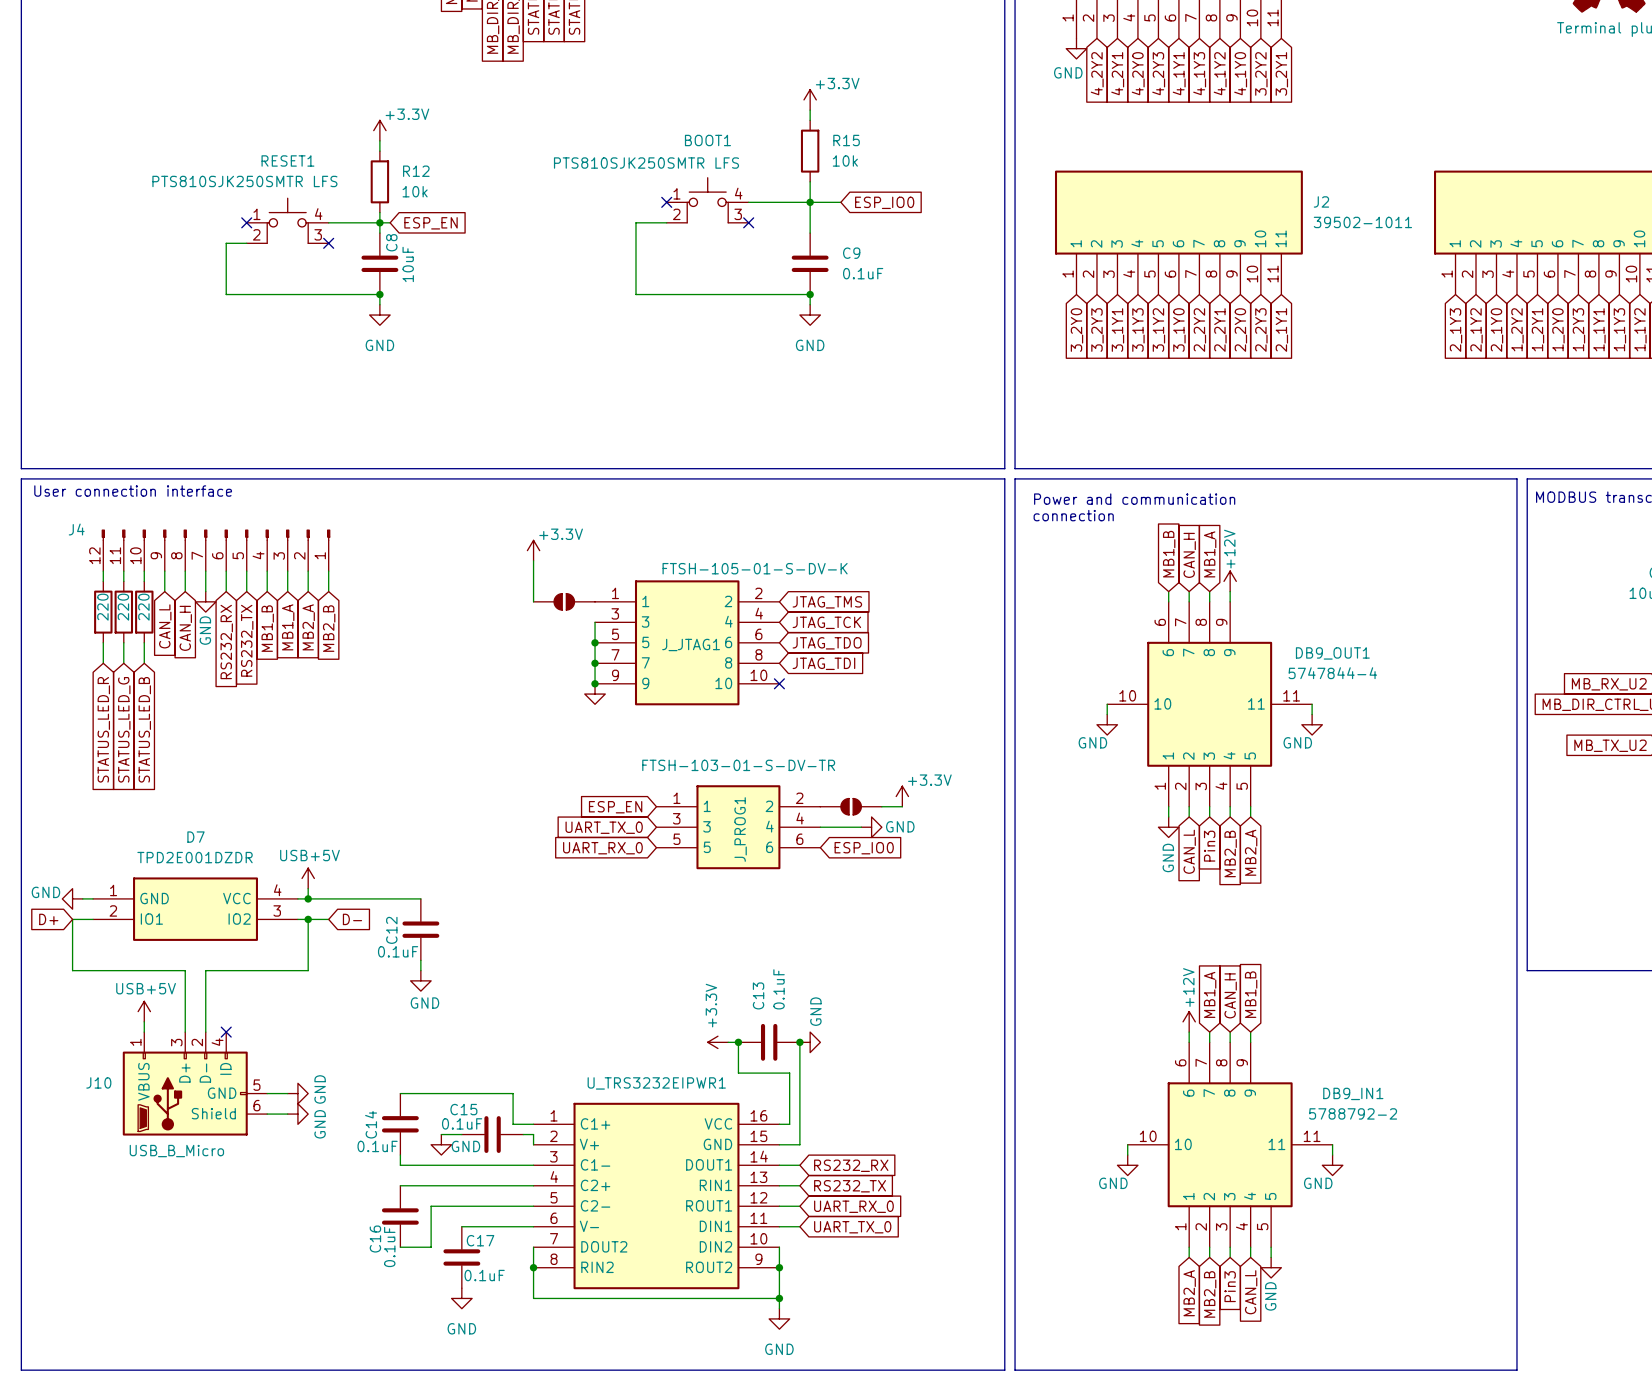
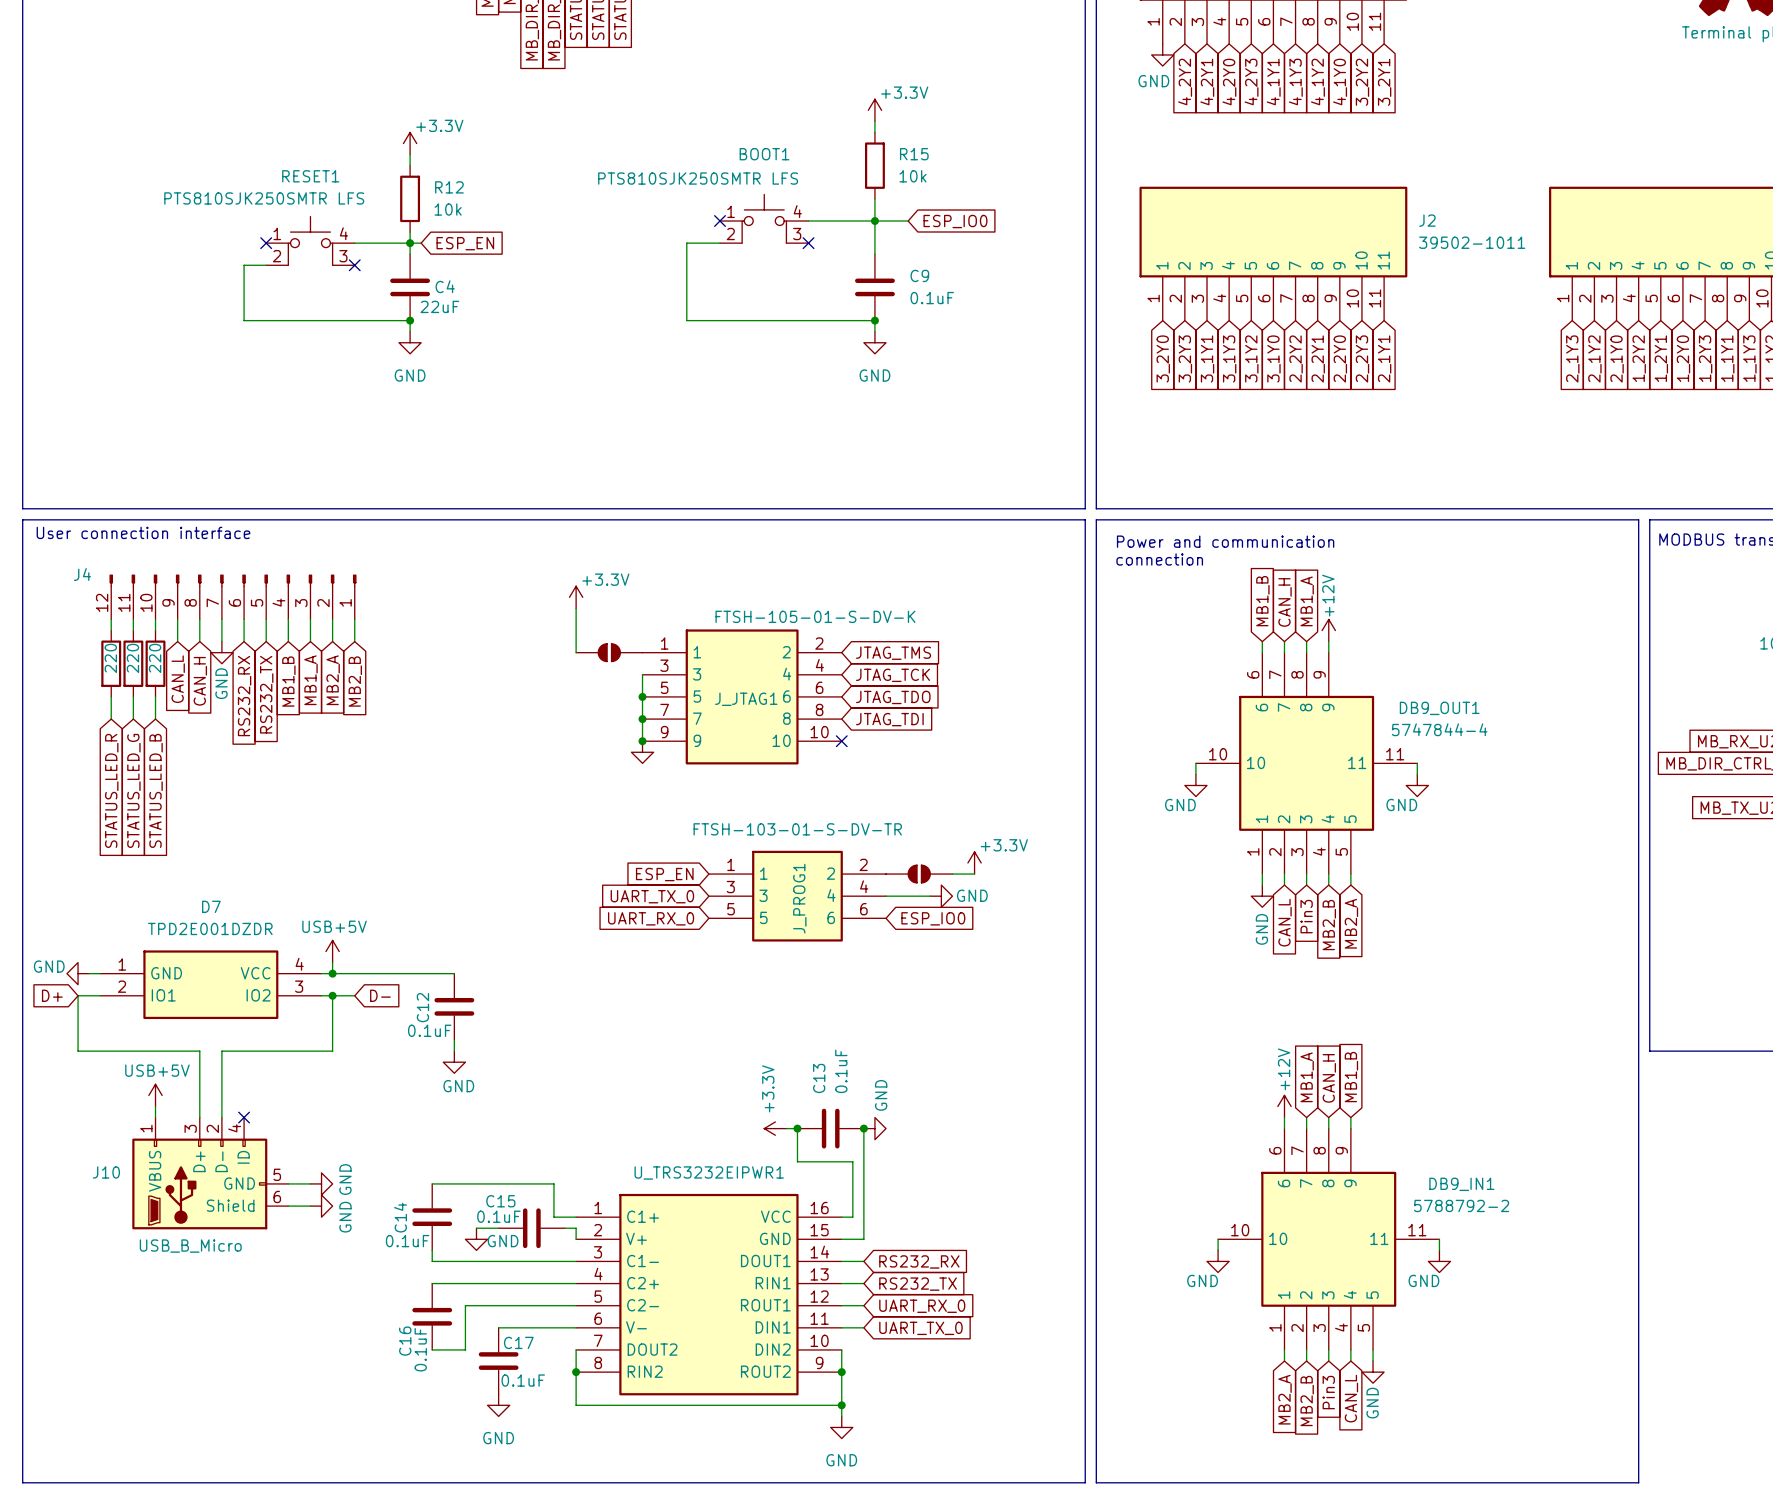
C8 name: C8 (391, 242) -> C4 (445, 286)
C8 value: 10uF (408, 264) -> 22uF (439, 306)

